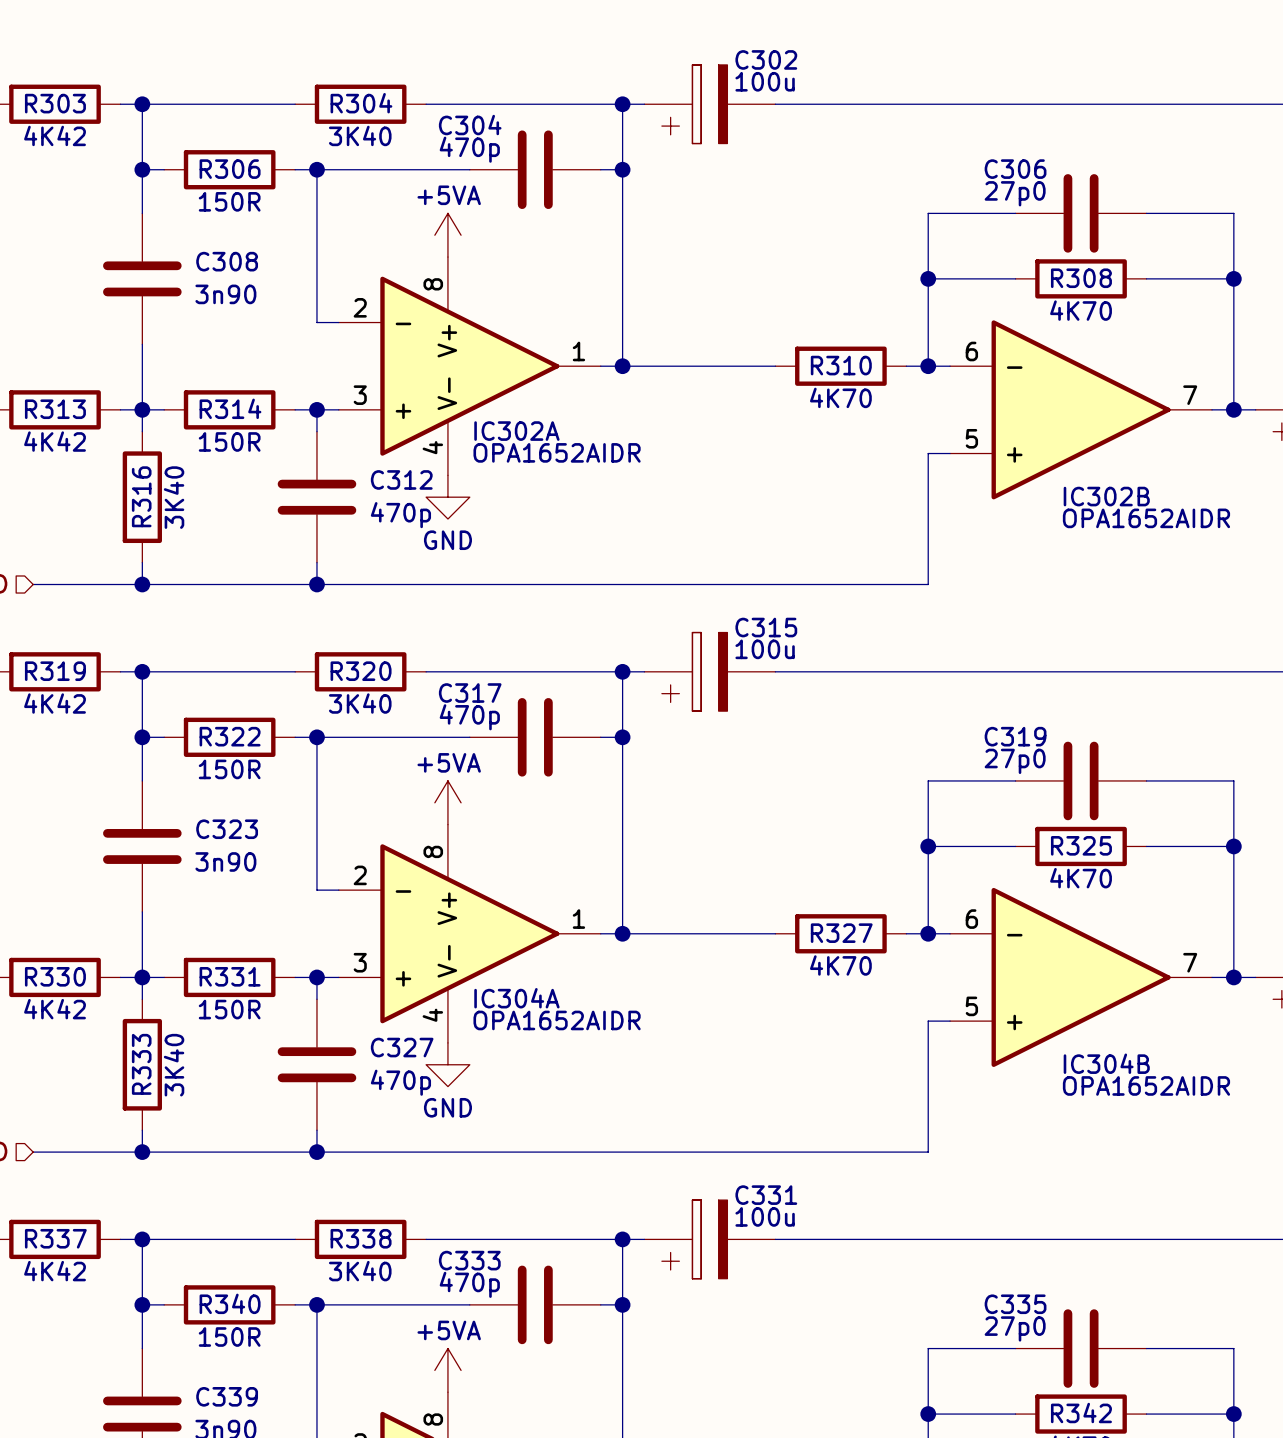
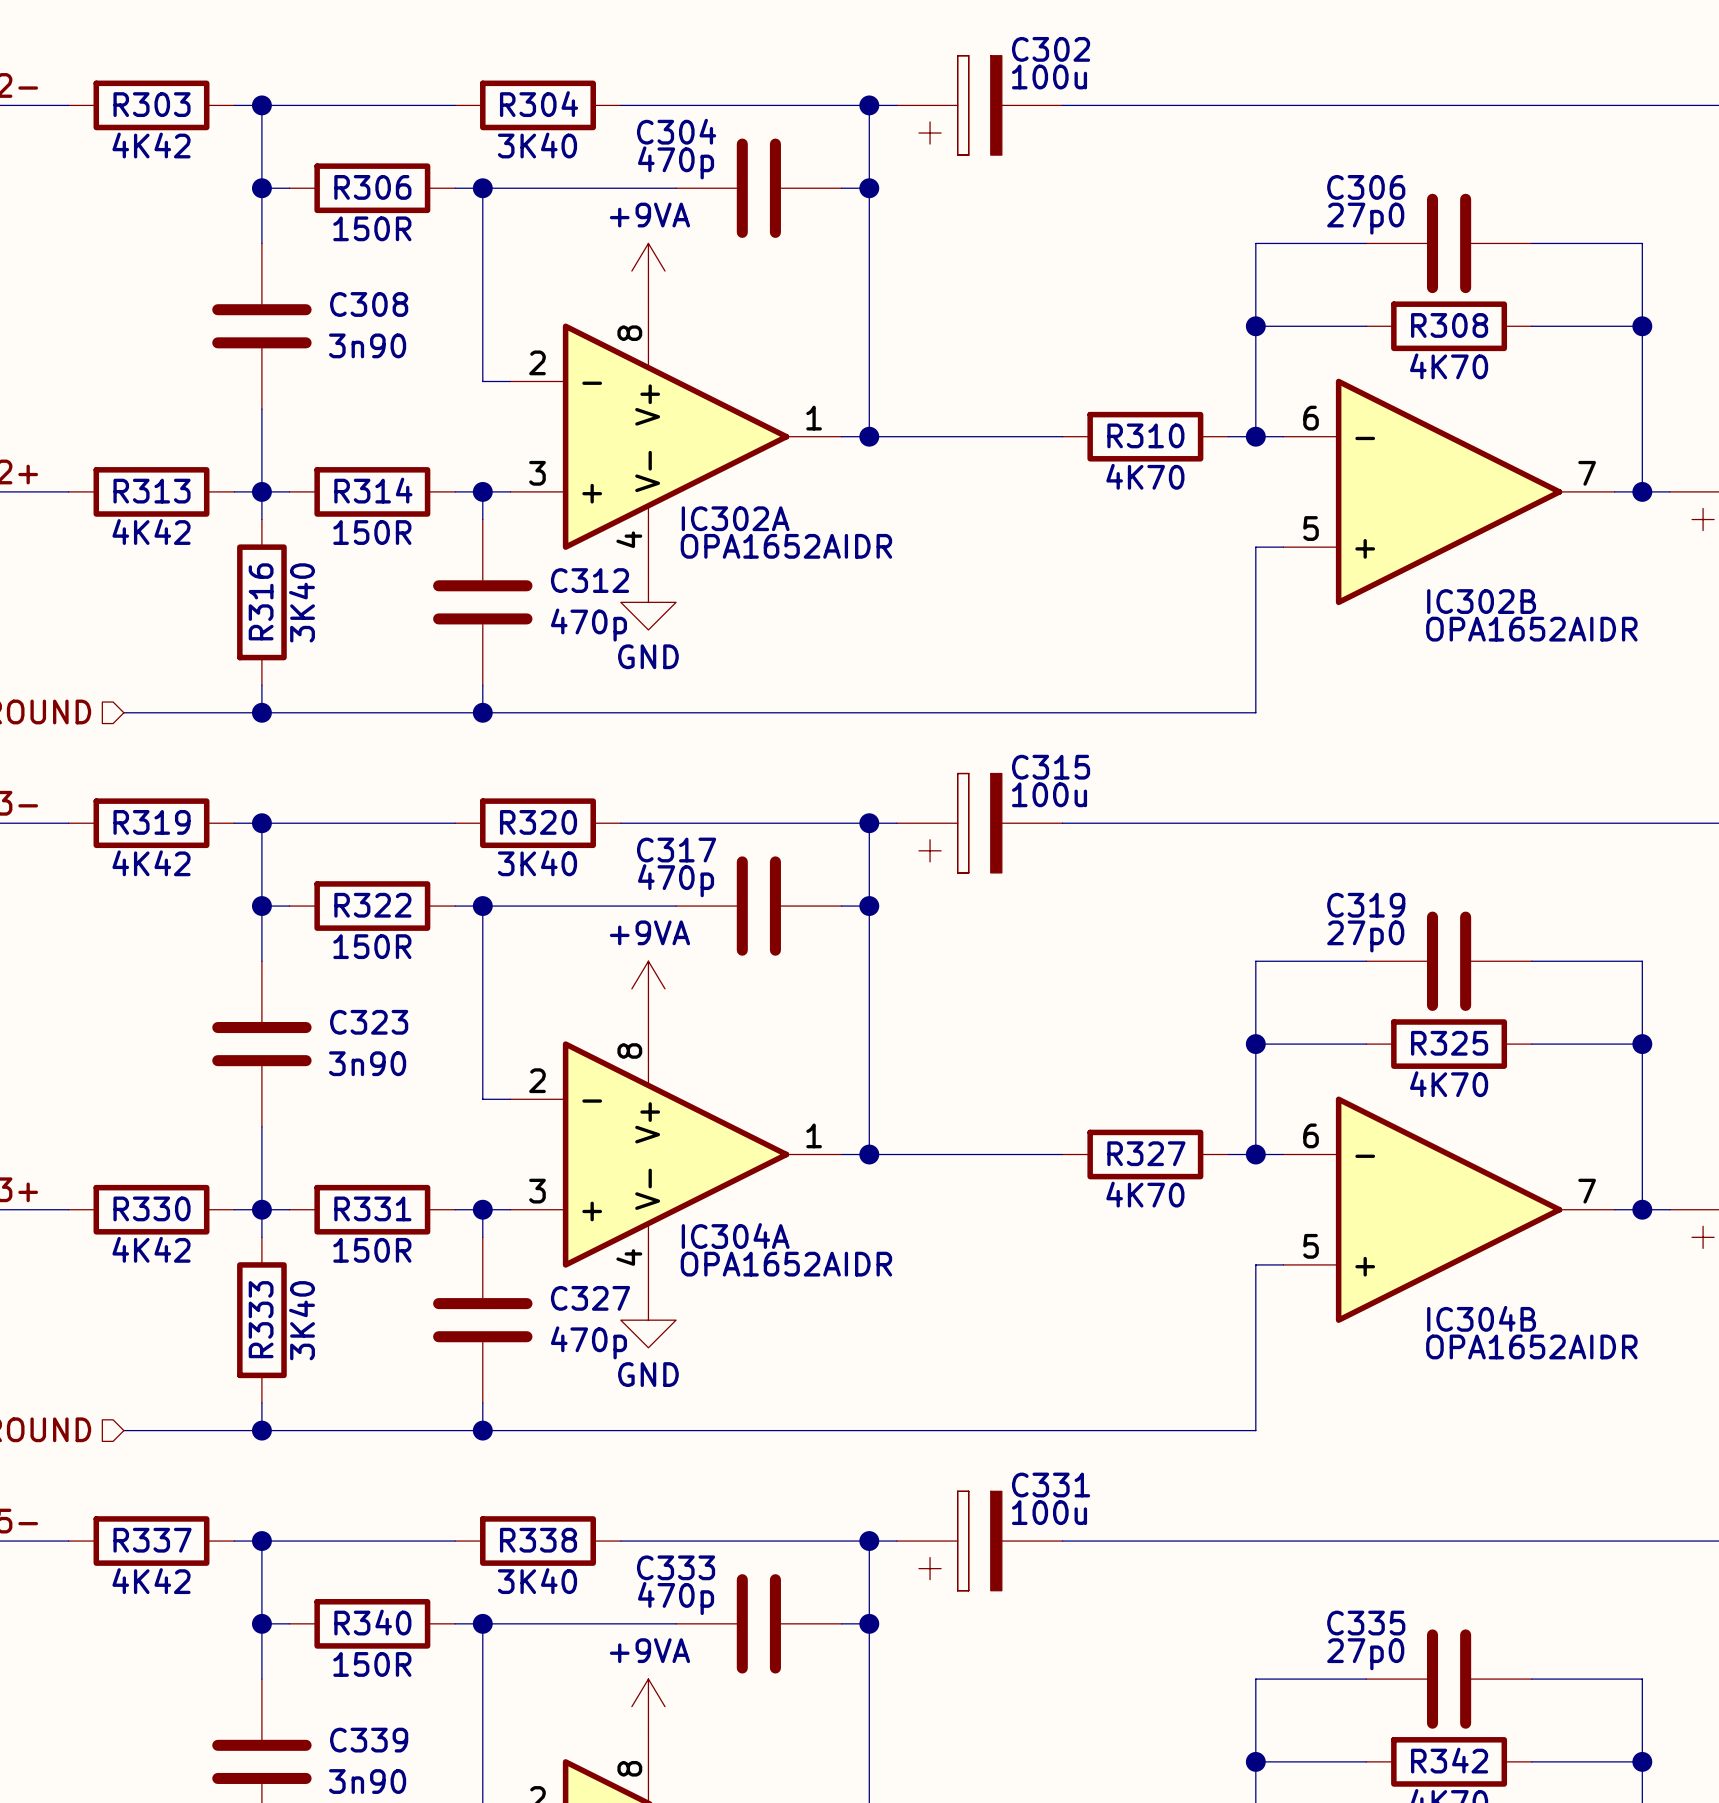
power symbol: +5VA (447, 235) -> +9VA (648, 271)
power symbol: +5VA (447, 802) -> +9VA (648, 988)
power symbol: +5VA (447, 1370) -> +9VA (648, 1706)

